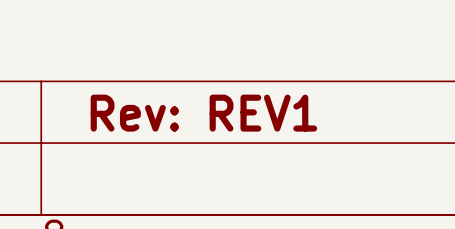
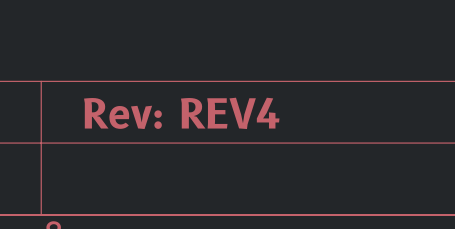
title block: Rev: REV1 (203, 113) -> Rev: REV4 (181, 113)

